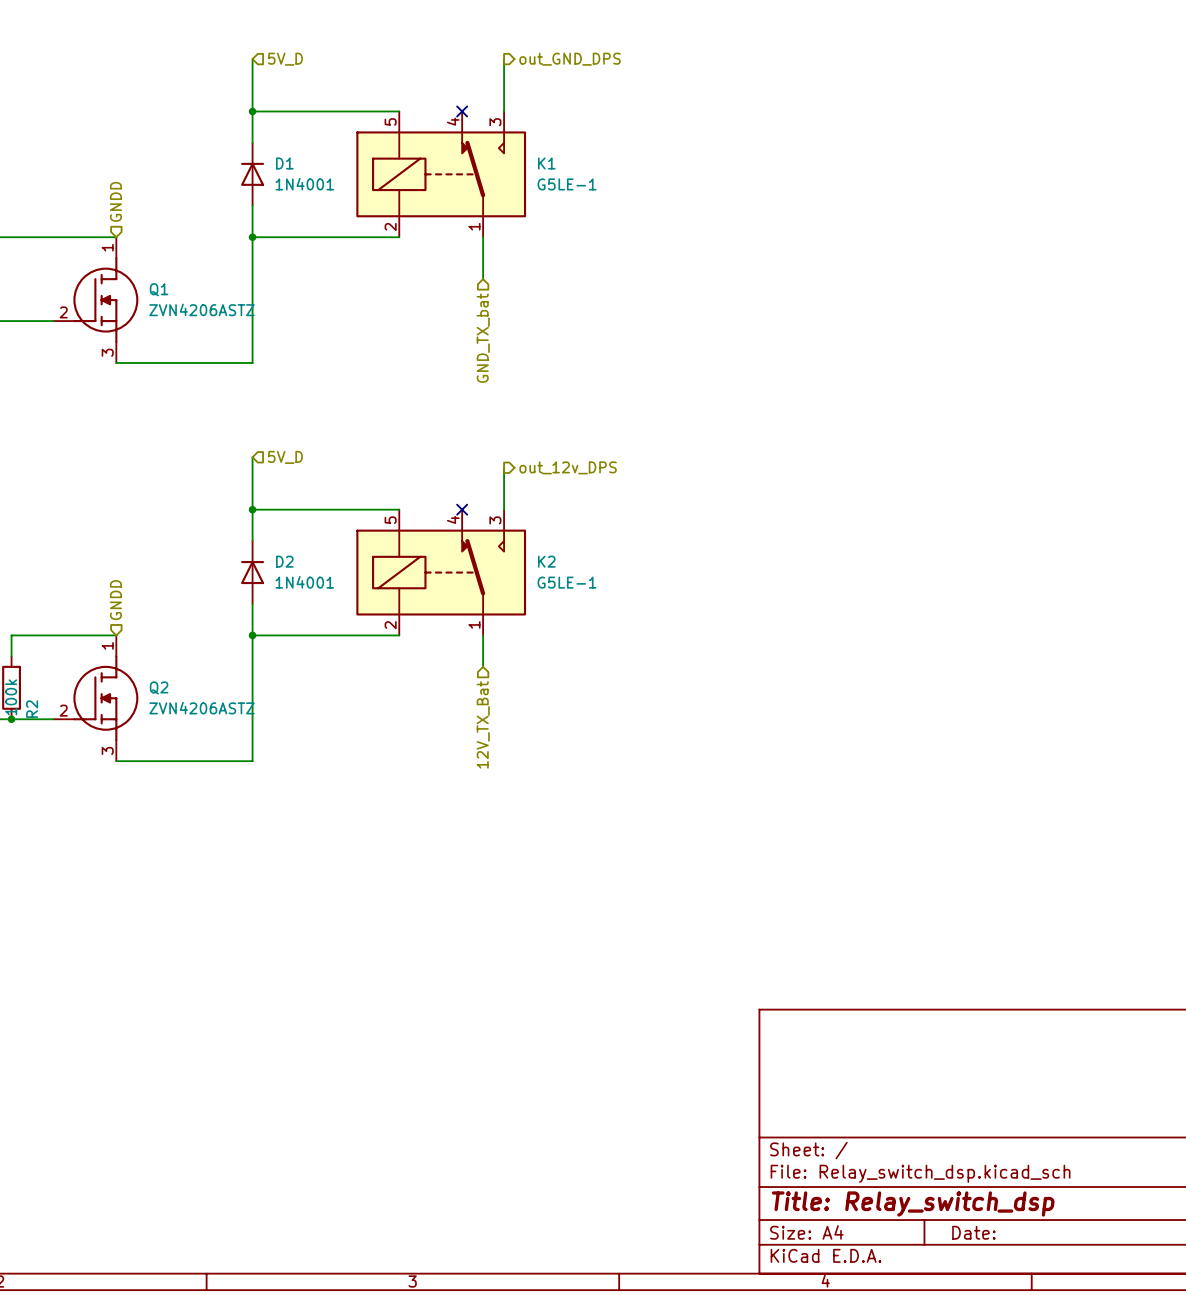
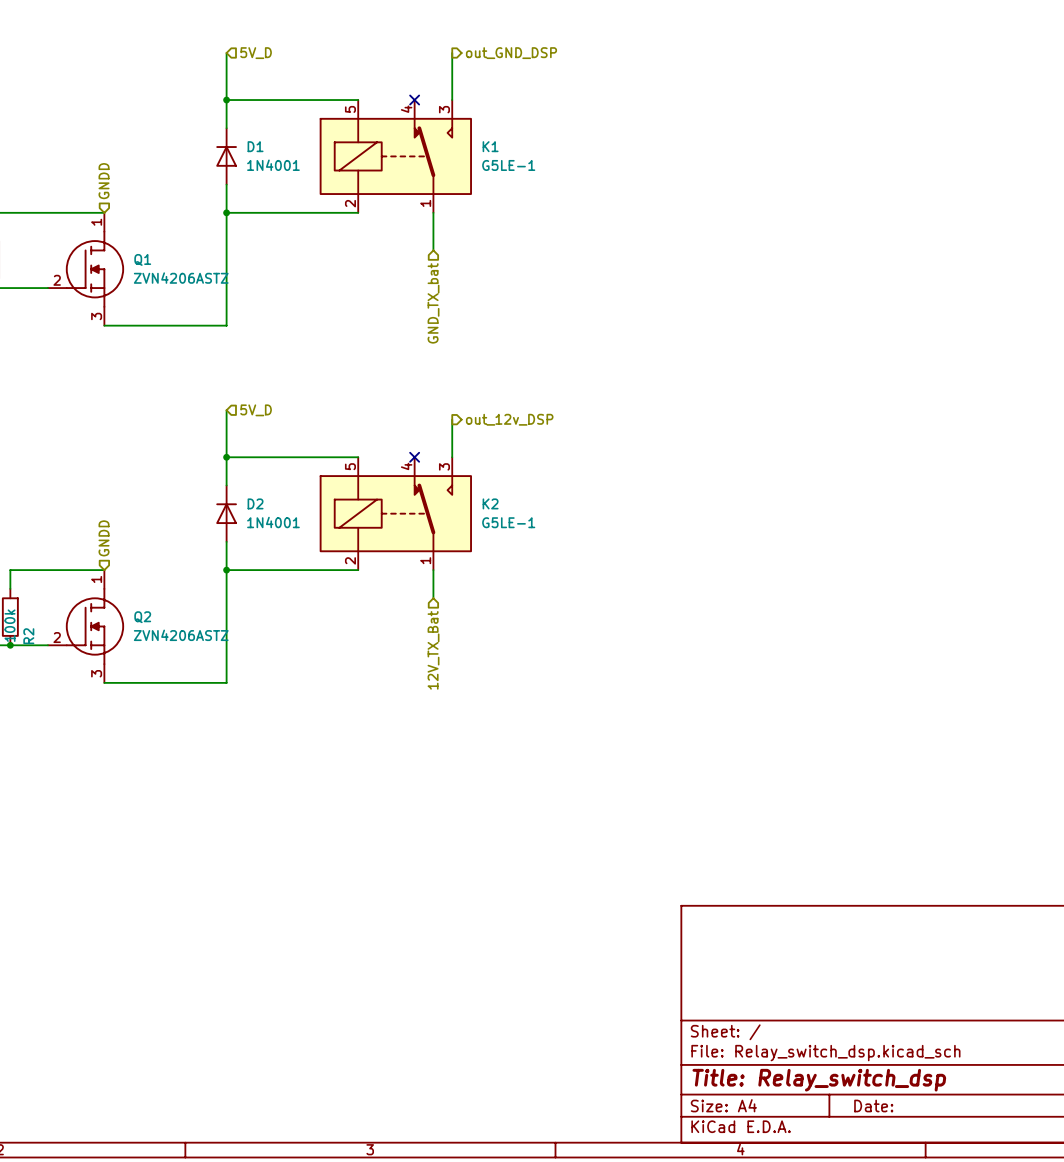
hierarchical label: out_GND_DPS (570, 59) -> out_GND_DSP (511, 53)
hierarchical label: out_12v_DPS (568, 467) -> out_12v_DSP (509, 419)

